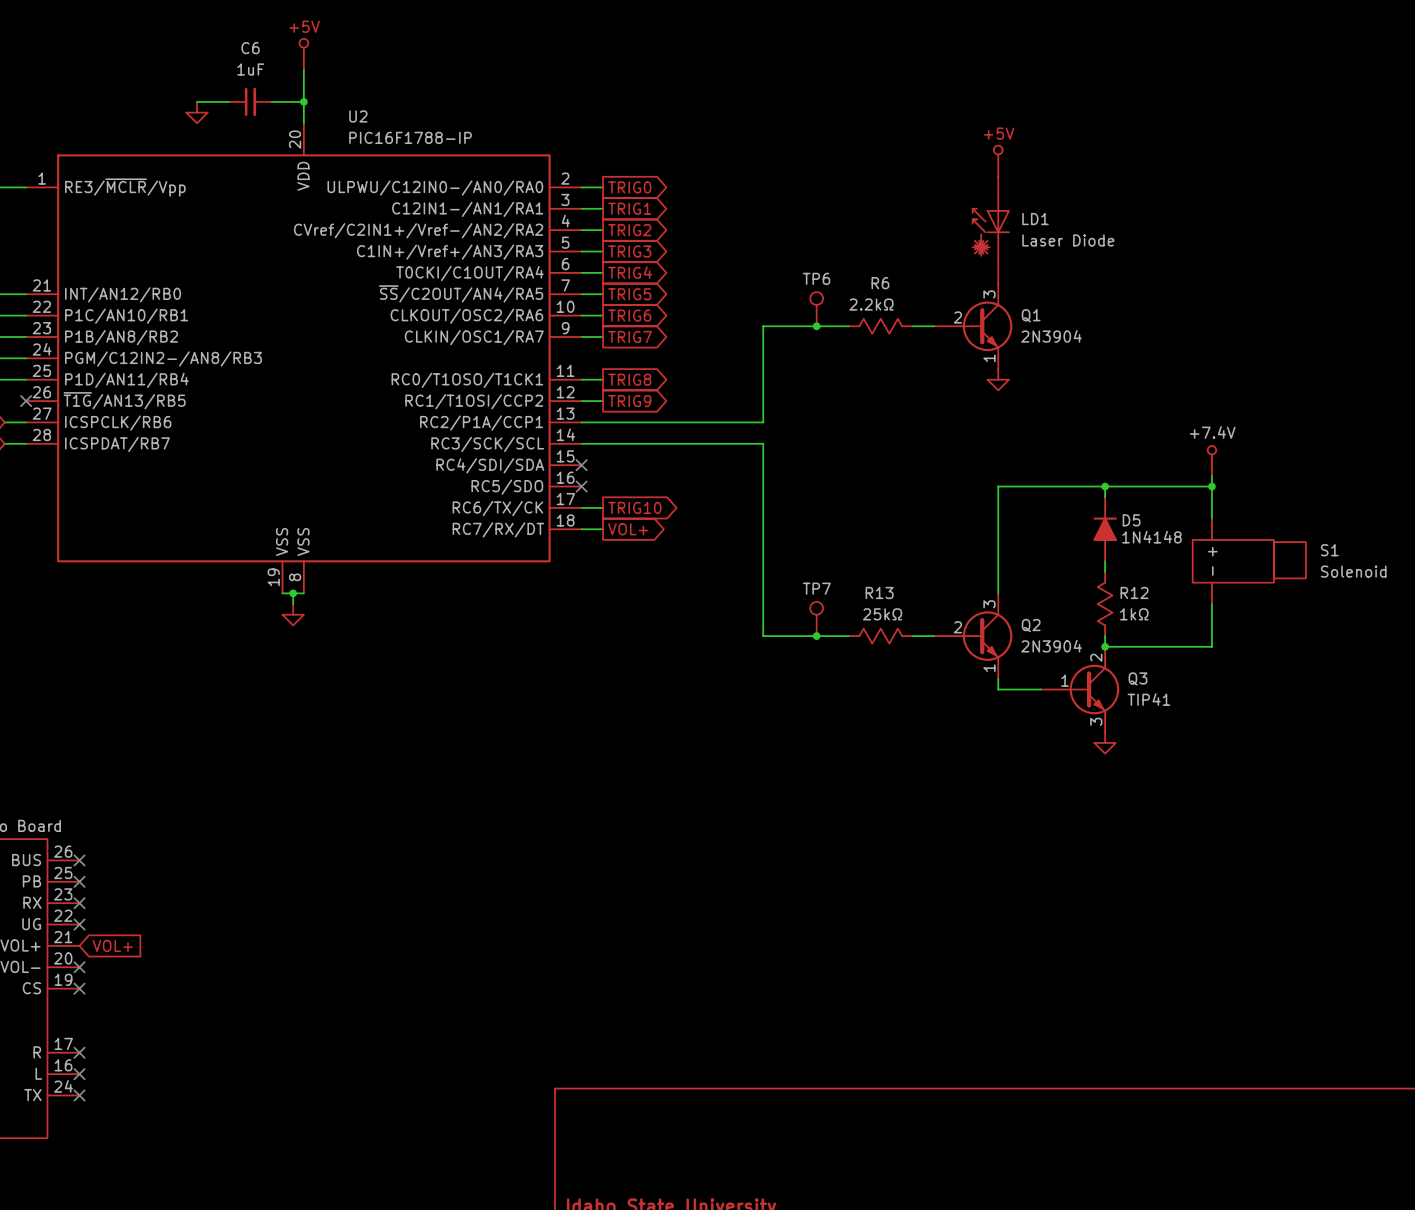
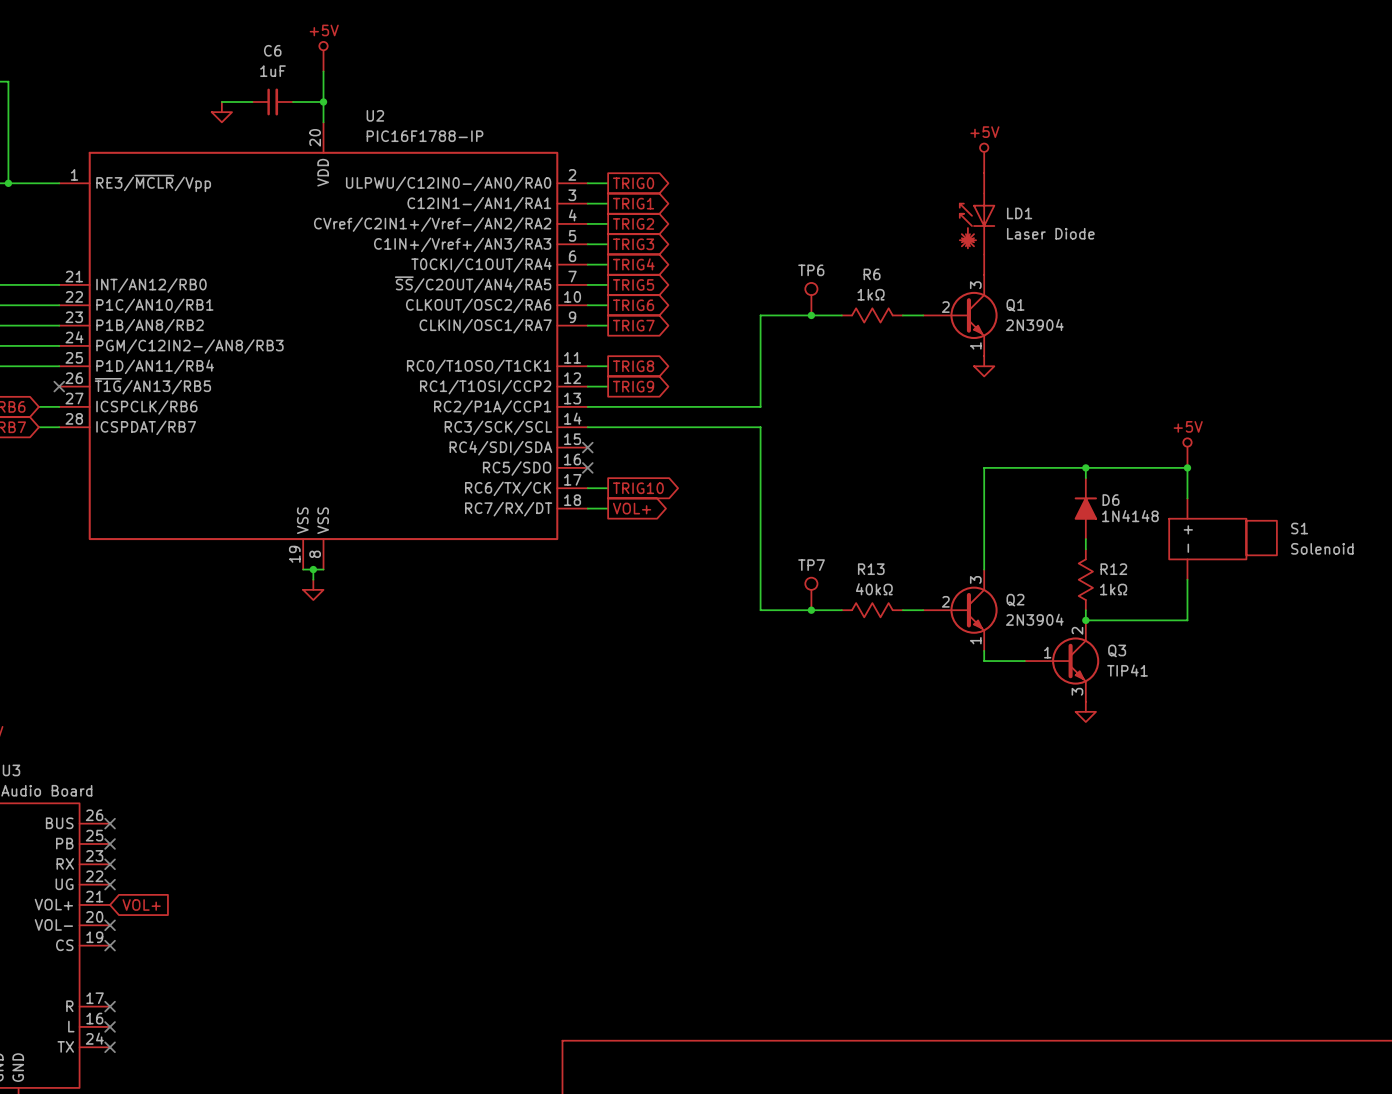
R6 value: 2.2kΩ (871, 304) -> 1kΩ (871, 294)
power symbol: +7.4V (1211, 460) -> none
power symbol: none -> (1187, 453)
D5 name: D5 (1131, 520) -> D6 (1111, 500)
R13 value: 25kΩ (882, 614) -> 40kΩ (874, 589)

